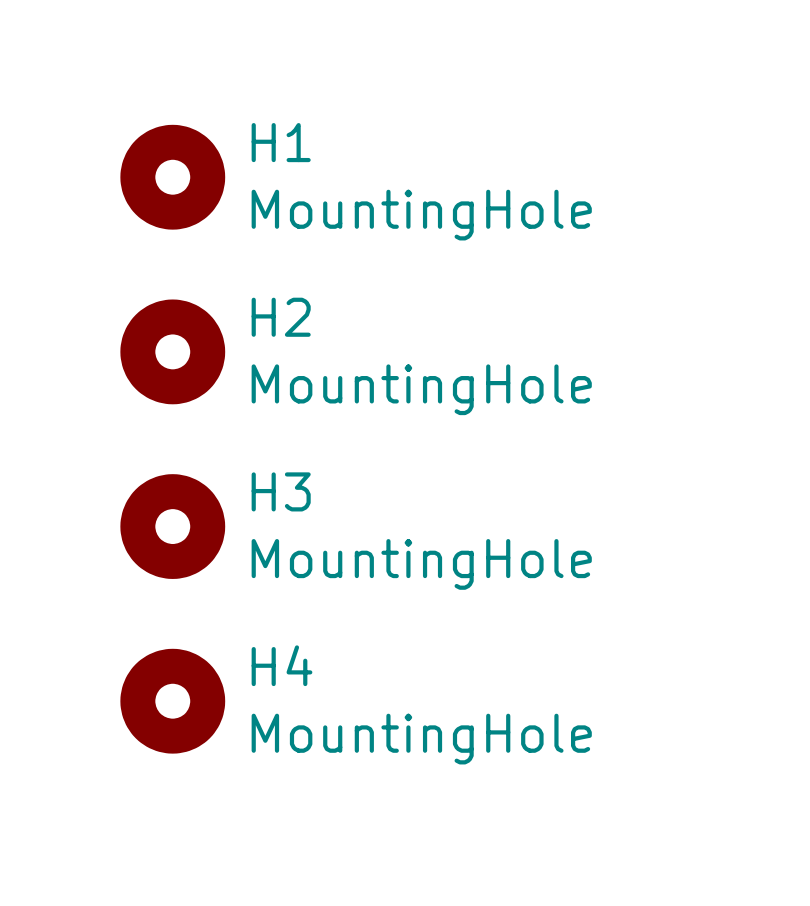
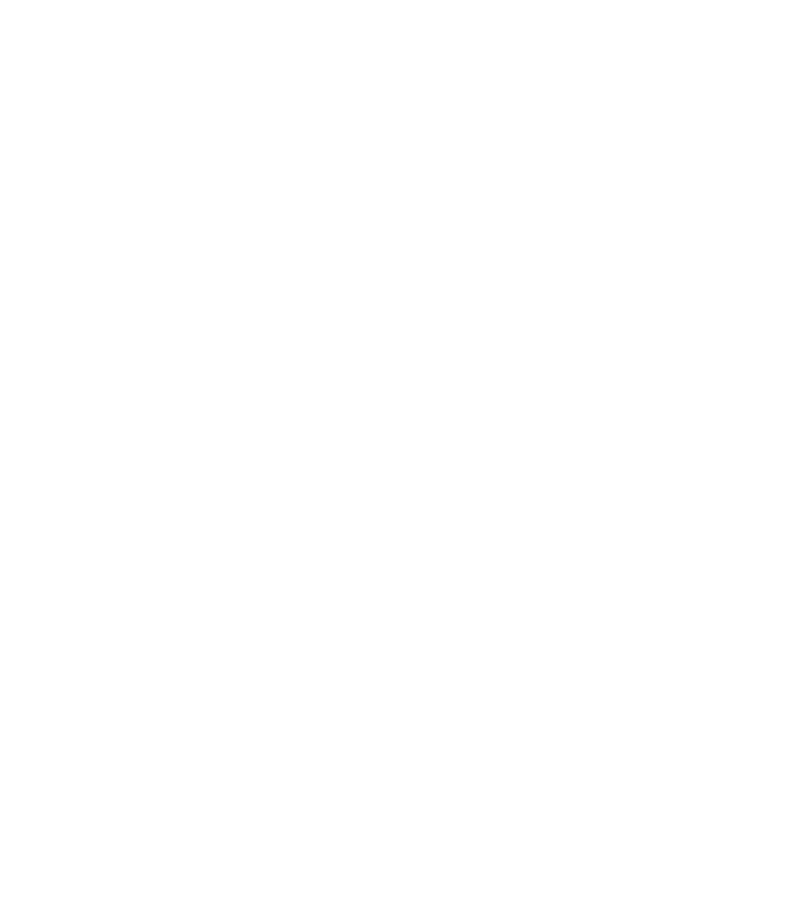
H1: MountingHole (172, 177) -> none
H2: MountingHole (172, 351) -> none
H3: MountingHole (172, 526) -> none
H4: MountingHole (172, 701) -> none

